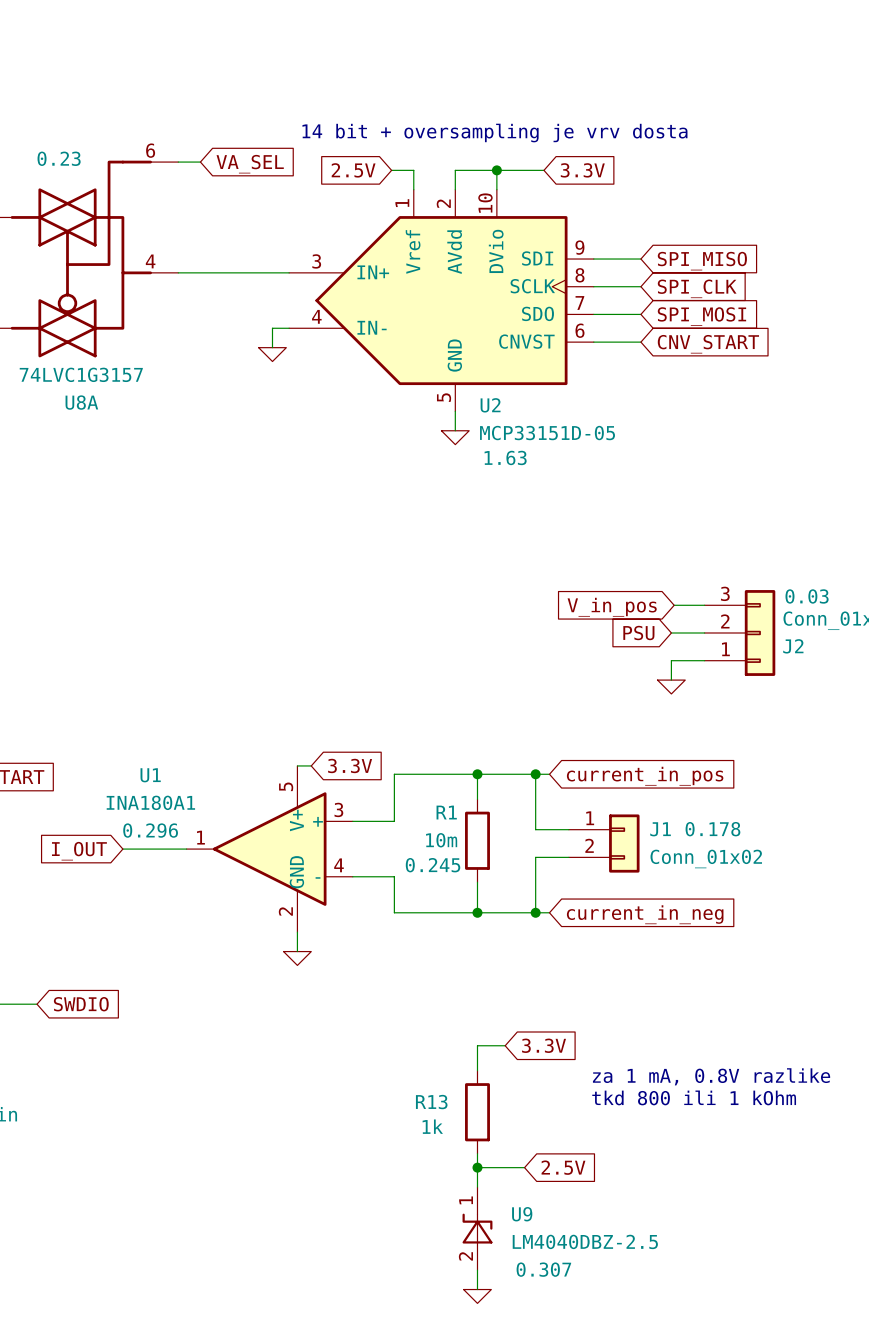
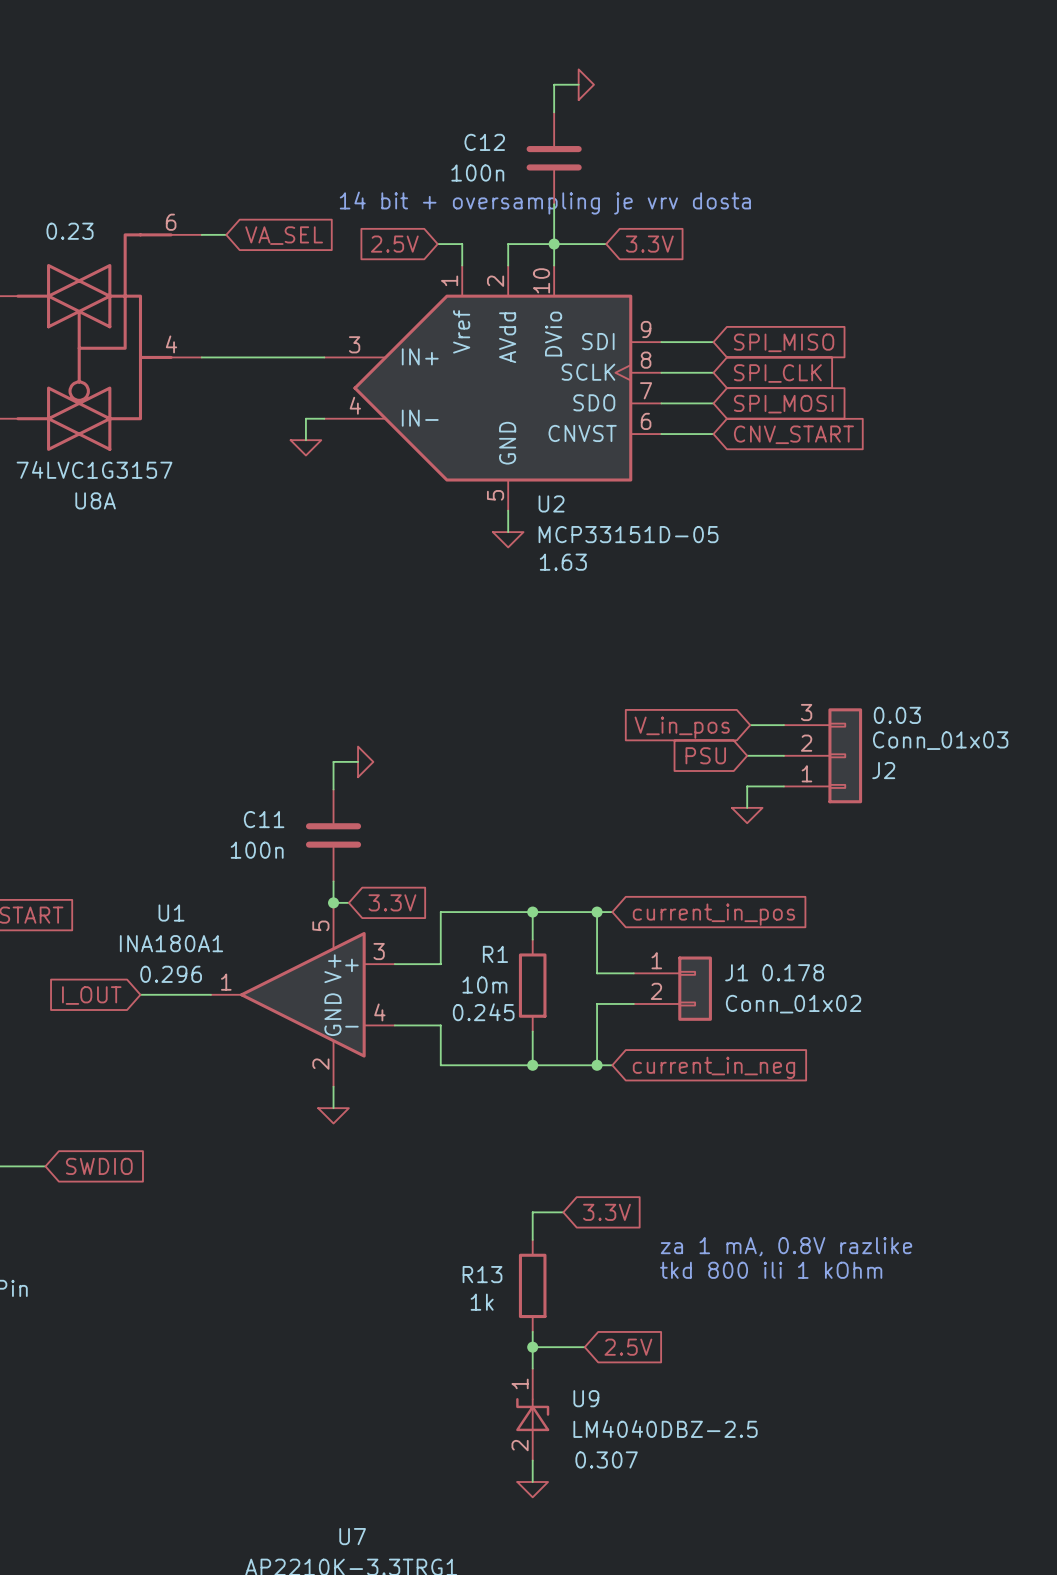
wire: none -> (578, 84) (554, 84) (554, 112)
power symbol: none -> (586, 84)
C12: none -> 100n (554, 158)
wire: none -> (554, 204) (554, 244)
wire: none -> (358, 761) (333, 761) (333, 789)
power symbol: none -> (365, 761)
C11: none -> 100n (333, 835)
wire: none -> (333, 881) (333, 902)
junction: none -> (333, 902)

